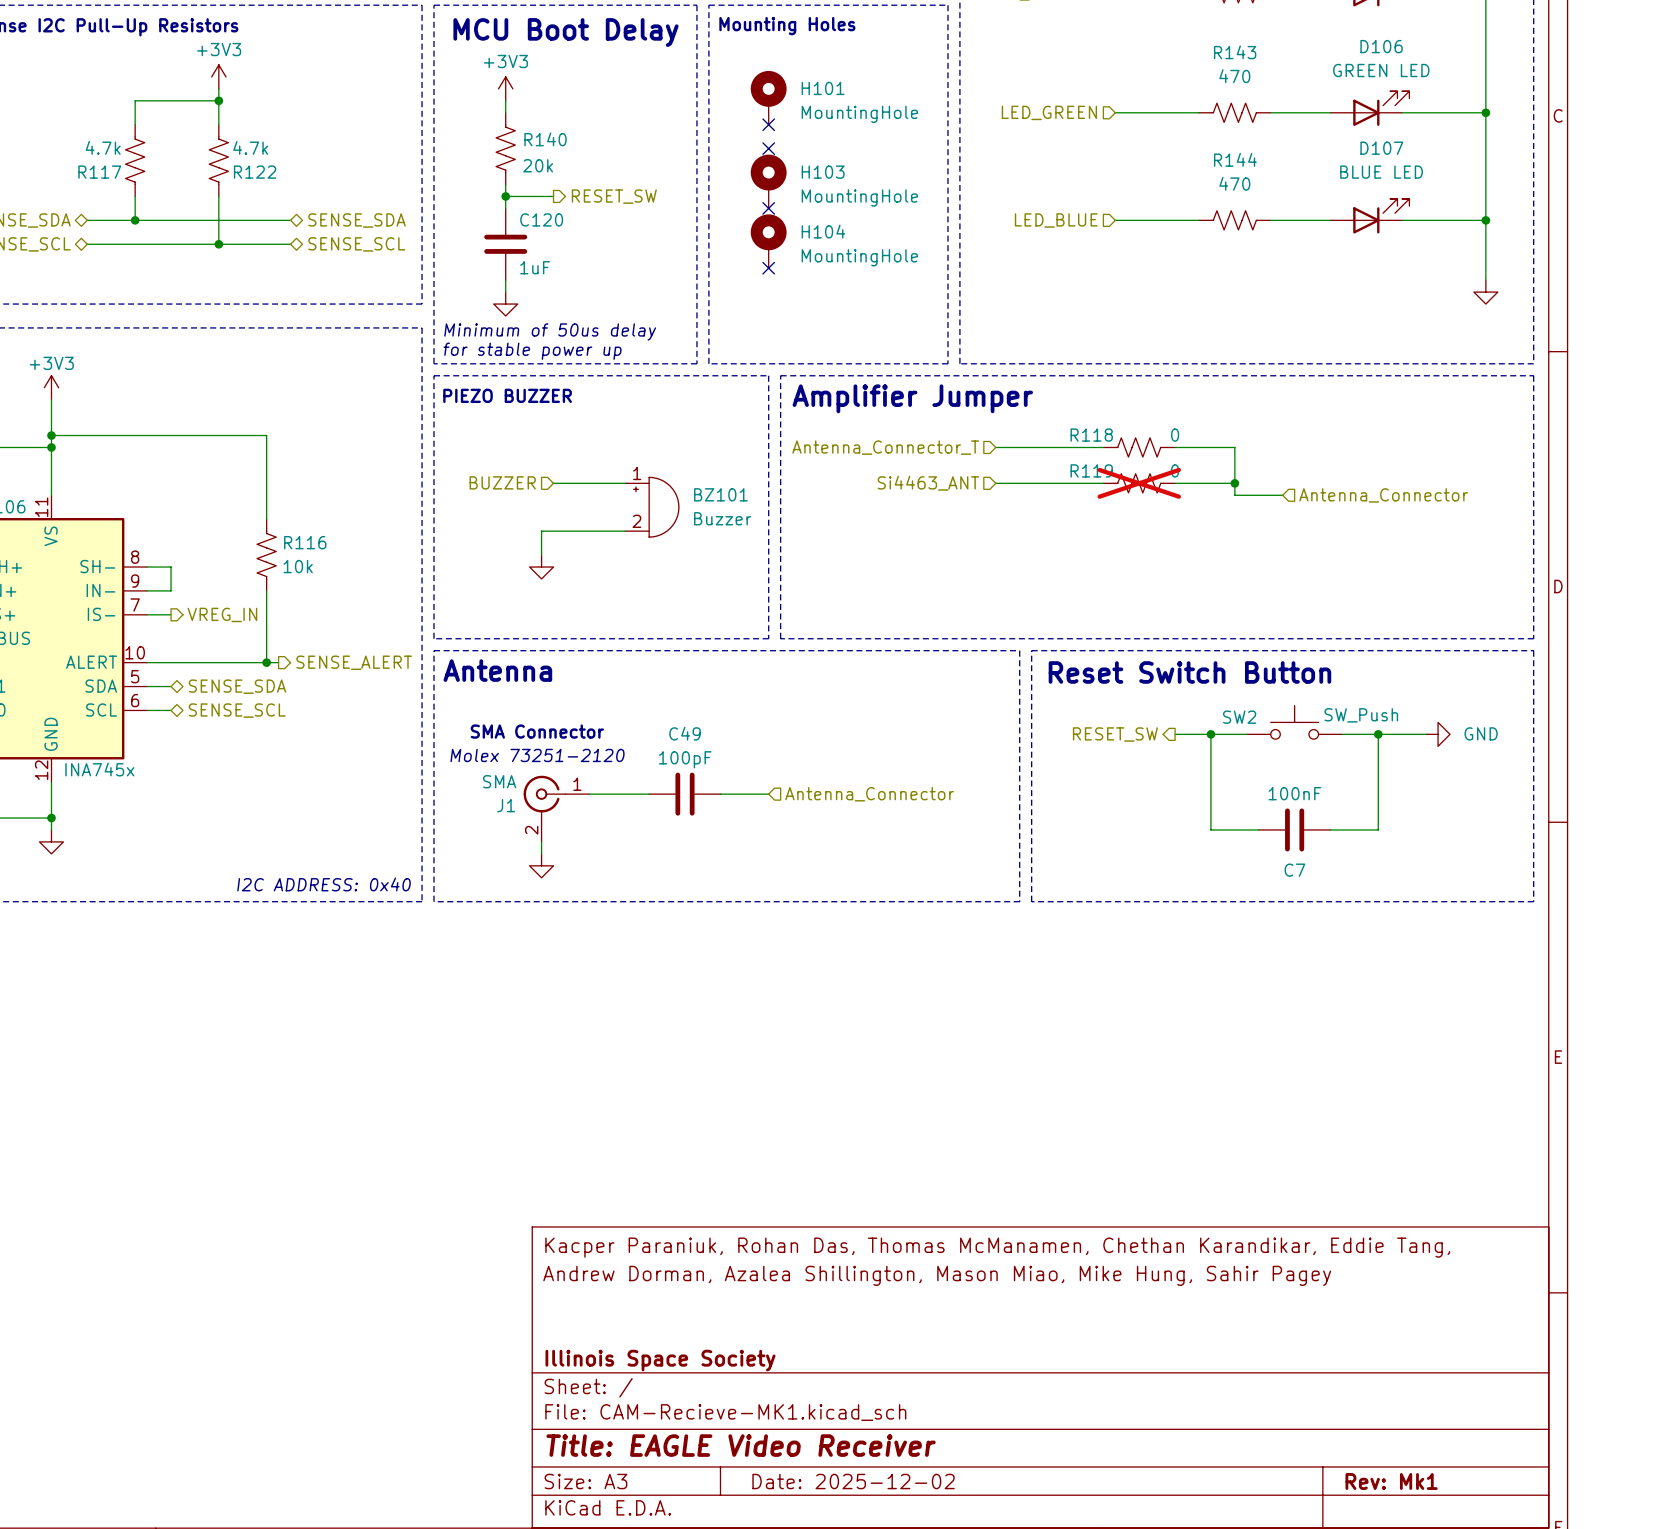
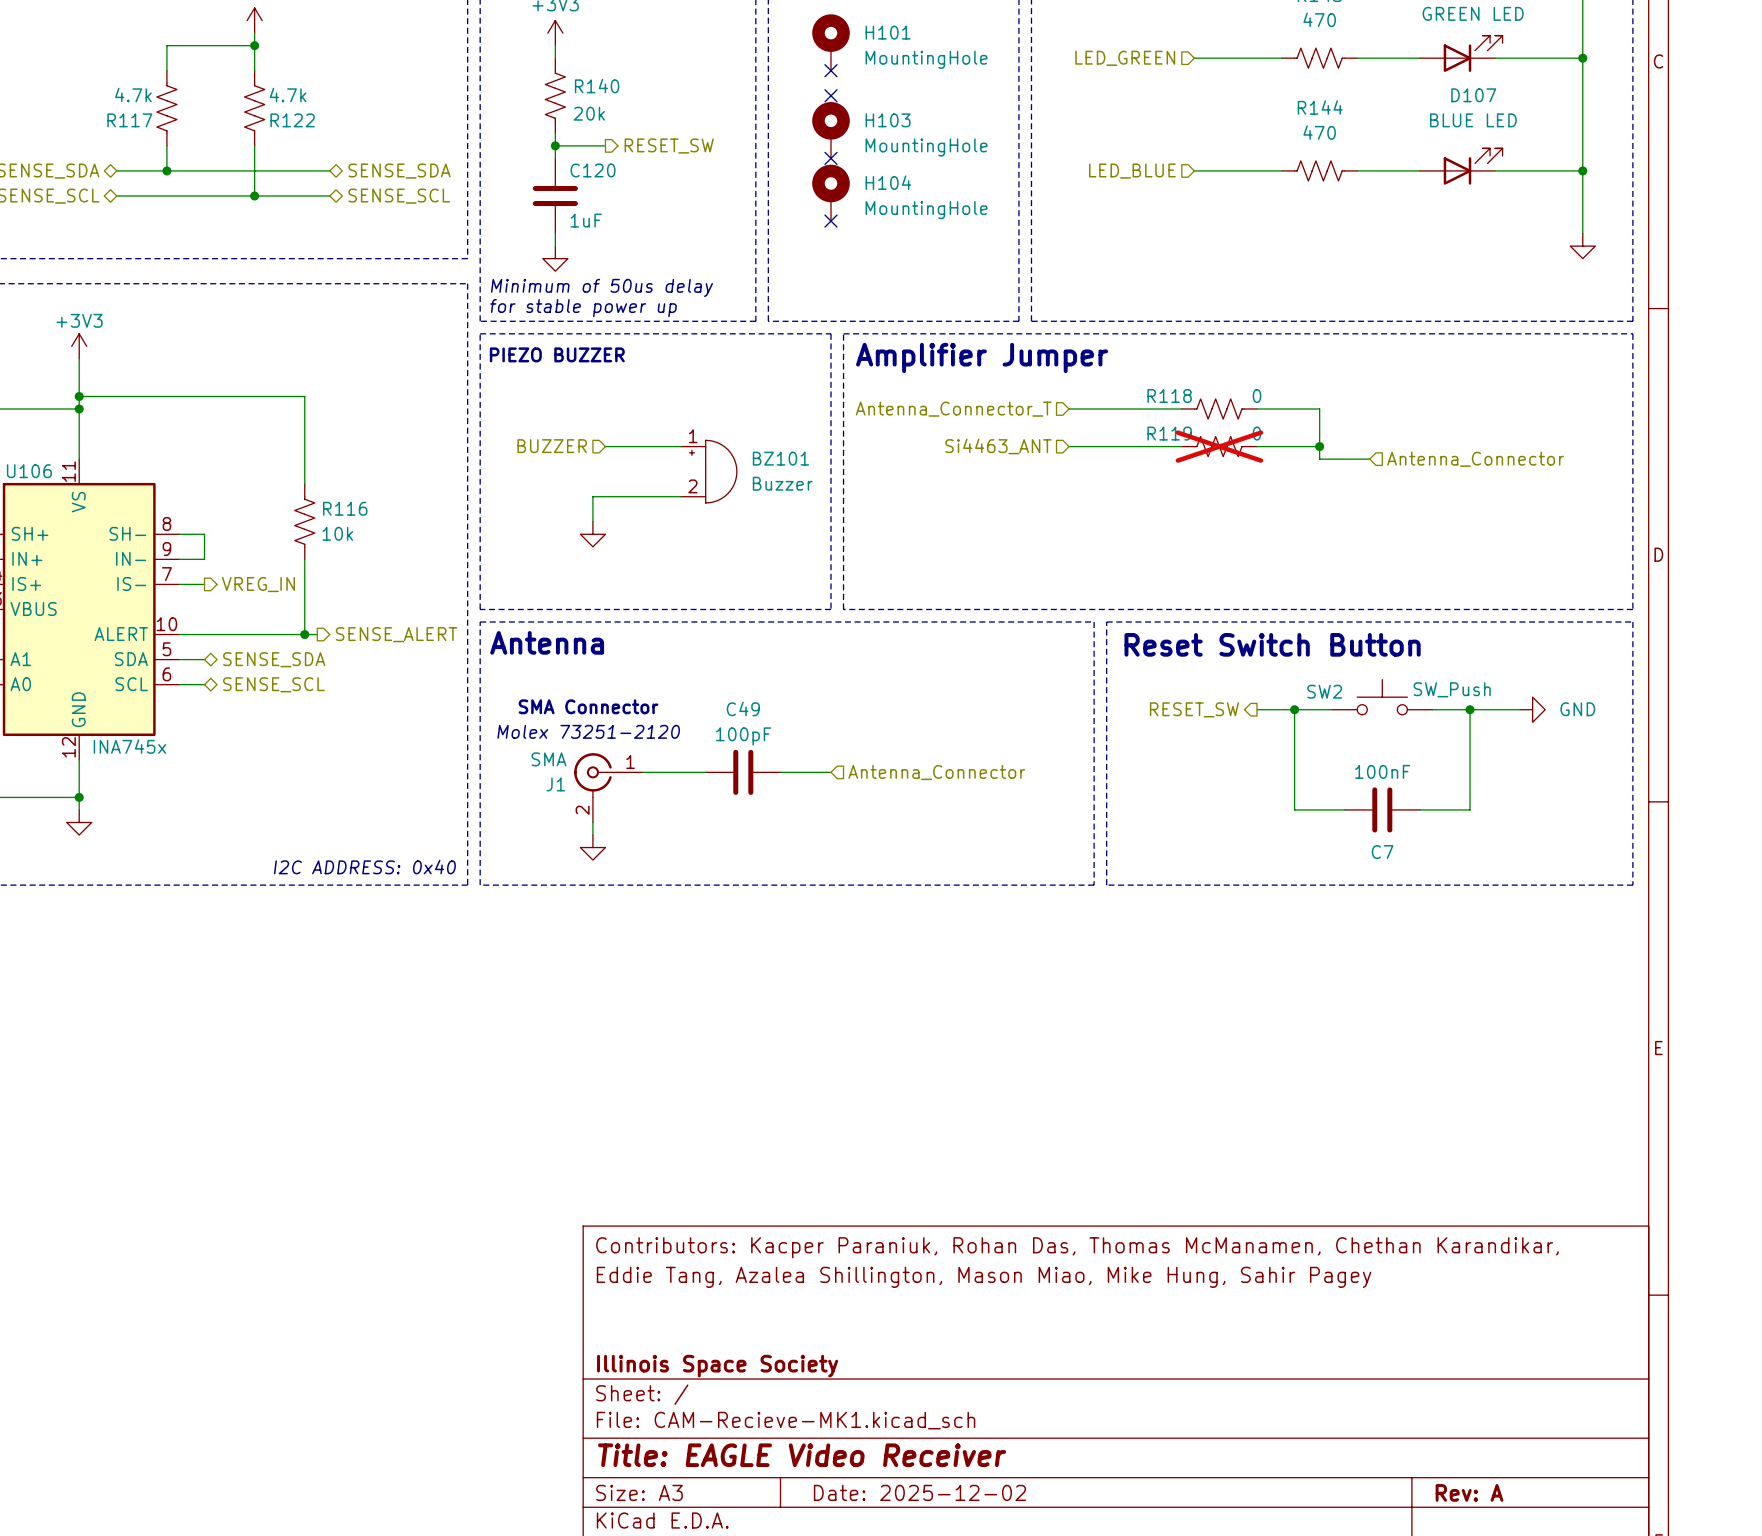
title block: Kacper Paraniuk, Rohan Das, Thomas McManamen, Chethan Karandikar, Eddie Tang, (997, 1247) -> Contributors: Kacper Paraniuk, Rohan Das, Thomas McManamen, Chethan Karandikar, (1077, 1247)
title block: Andrew Dorman, Azalea Shillington, Mason Miao, Mike Hung, Sahir Pagey (937, 1275) -> Eddie Tang, Azalea Shillington, Mason Miao, Mike Hung, Sahir Pagey (984, 1277)
title block: Rev: Mk1 (1391, 1481) -> Rev: A (1469, 1492)

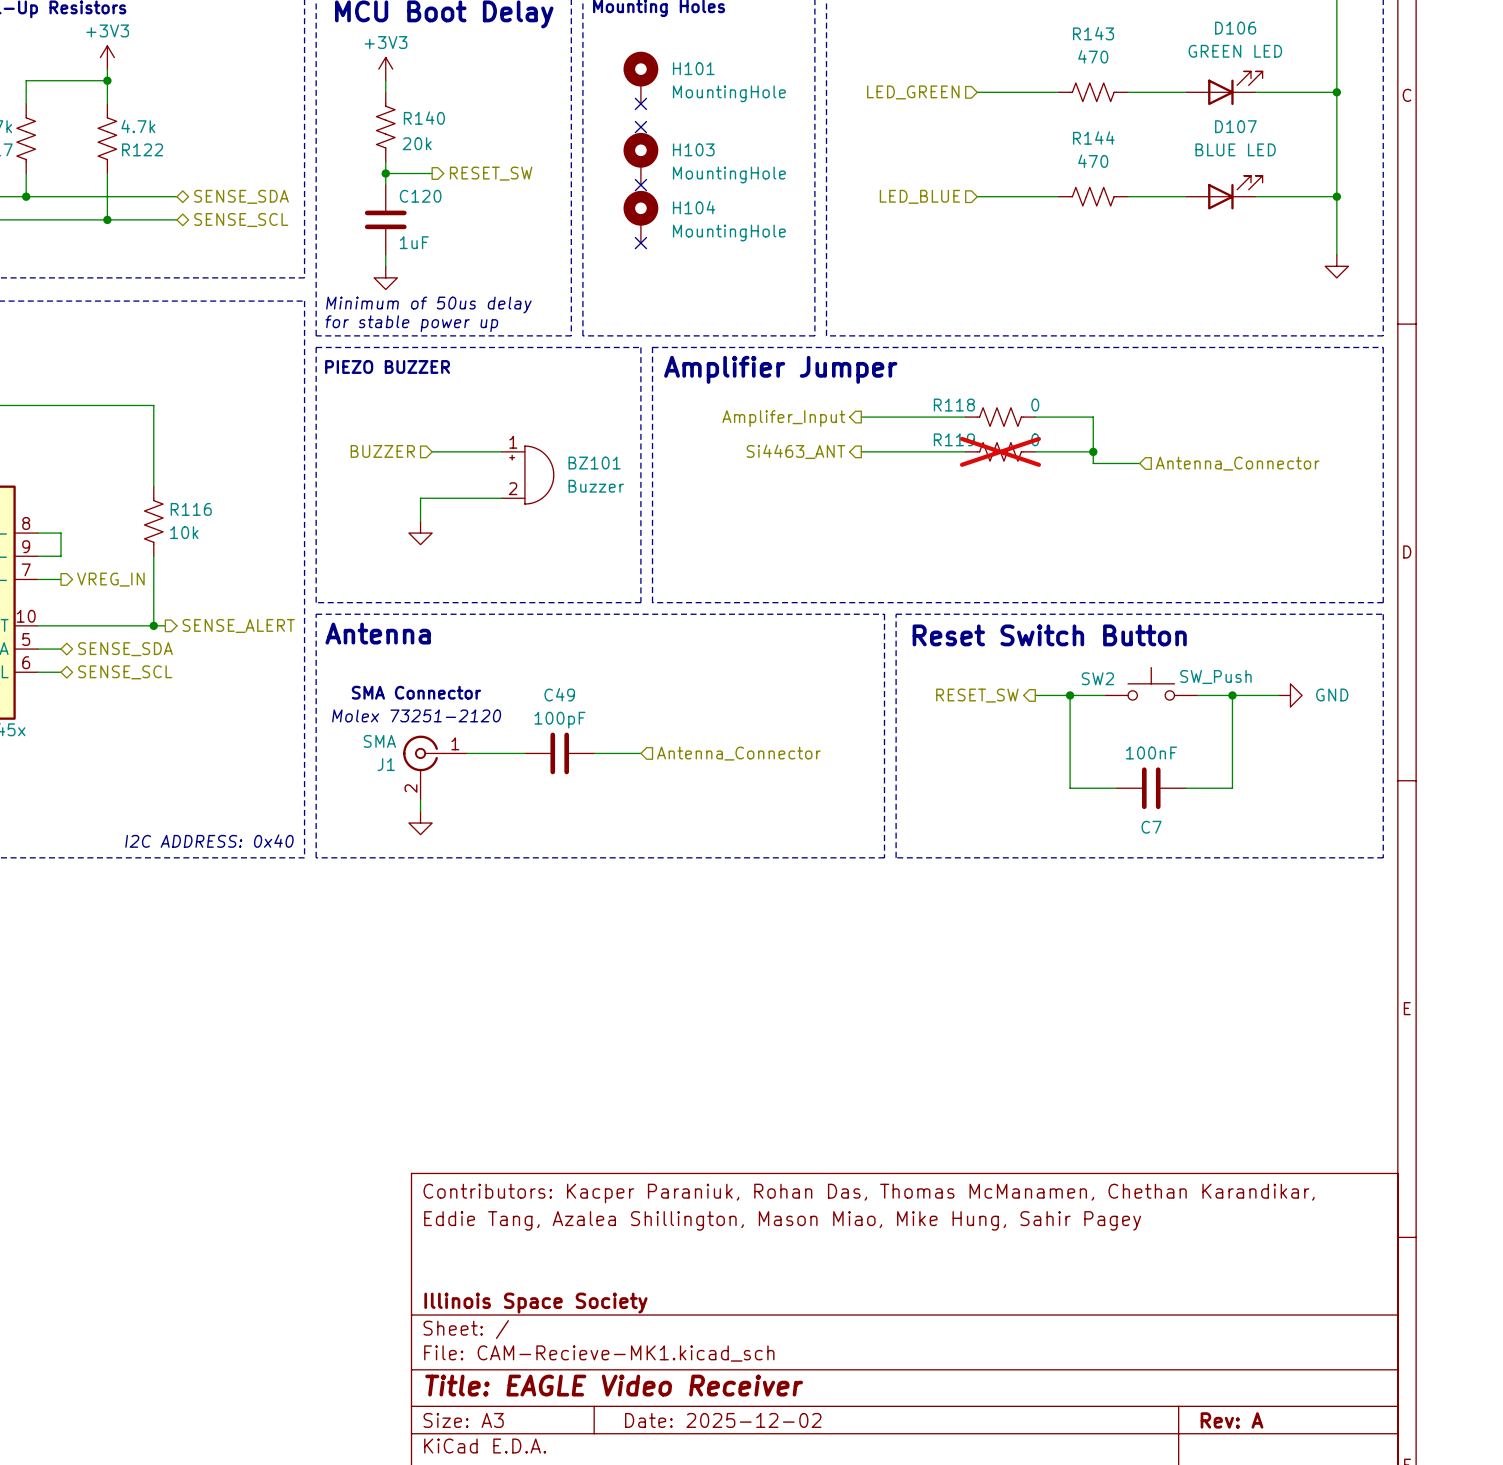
hierarchical label shape: input (953, 409) -> output (783, 418)
hierarchical label: Antenna_Connector_T (953, 409) -> Amplifer_Input (783, 418)
hierarchical label shape: input (998, 446) -> output (795, 451)

